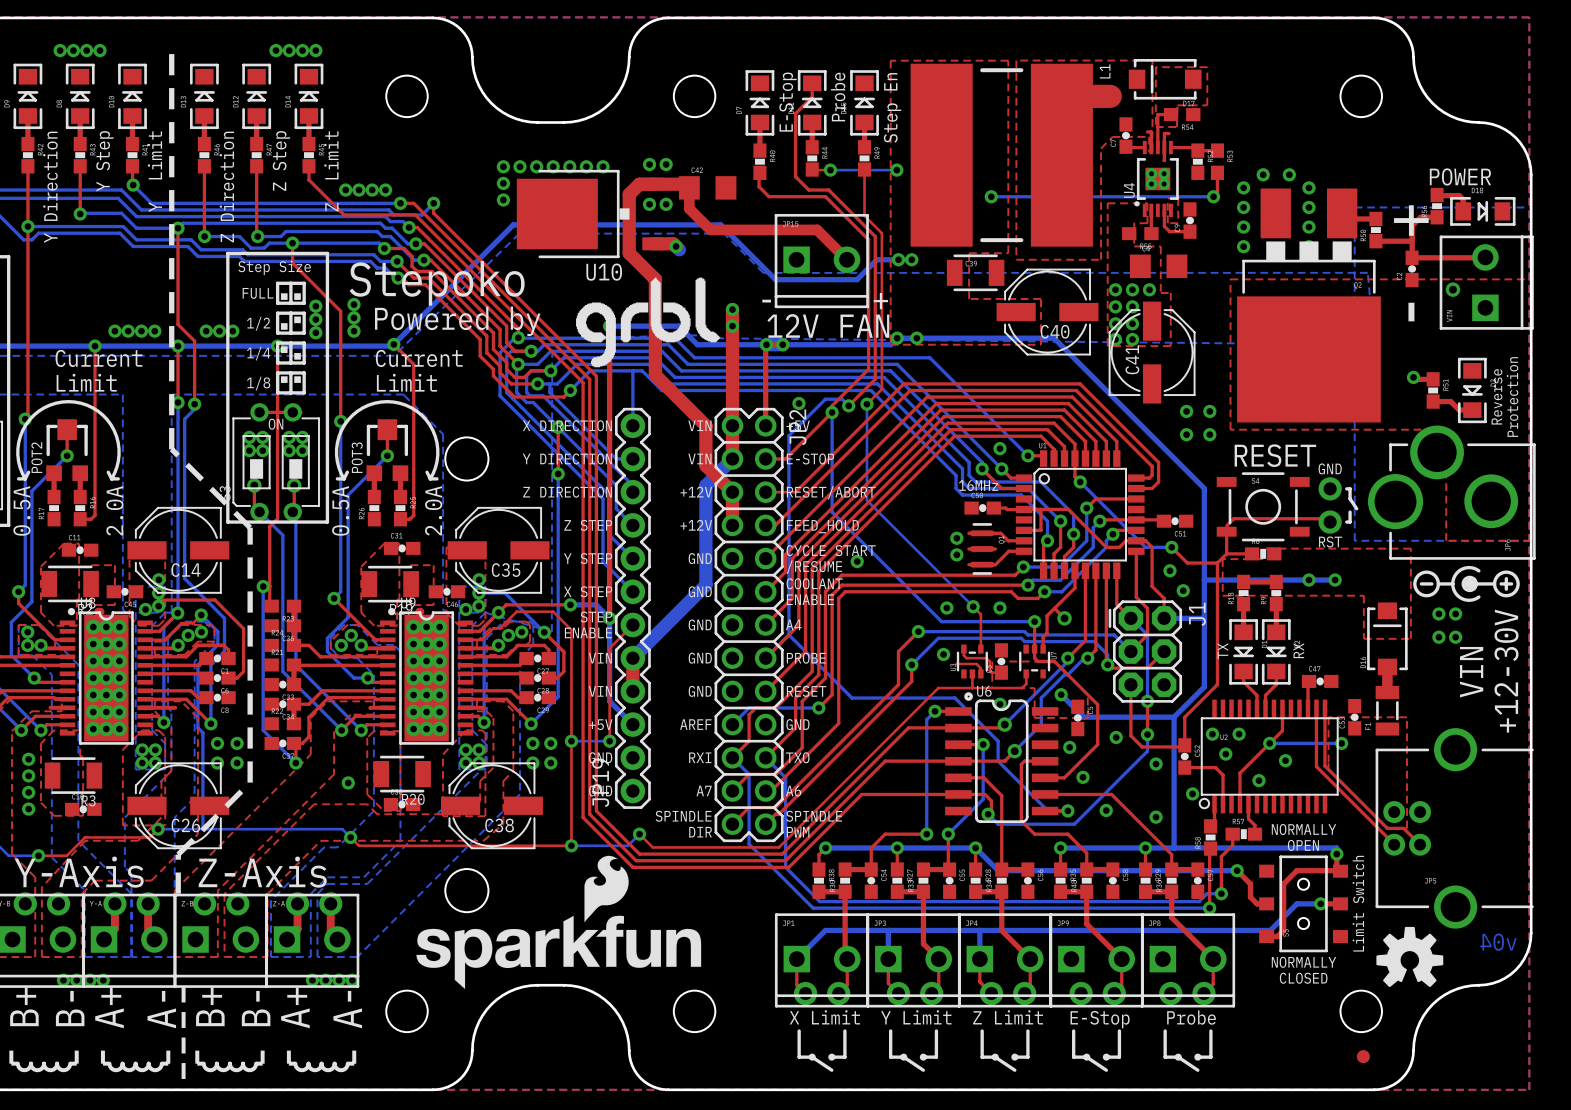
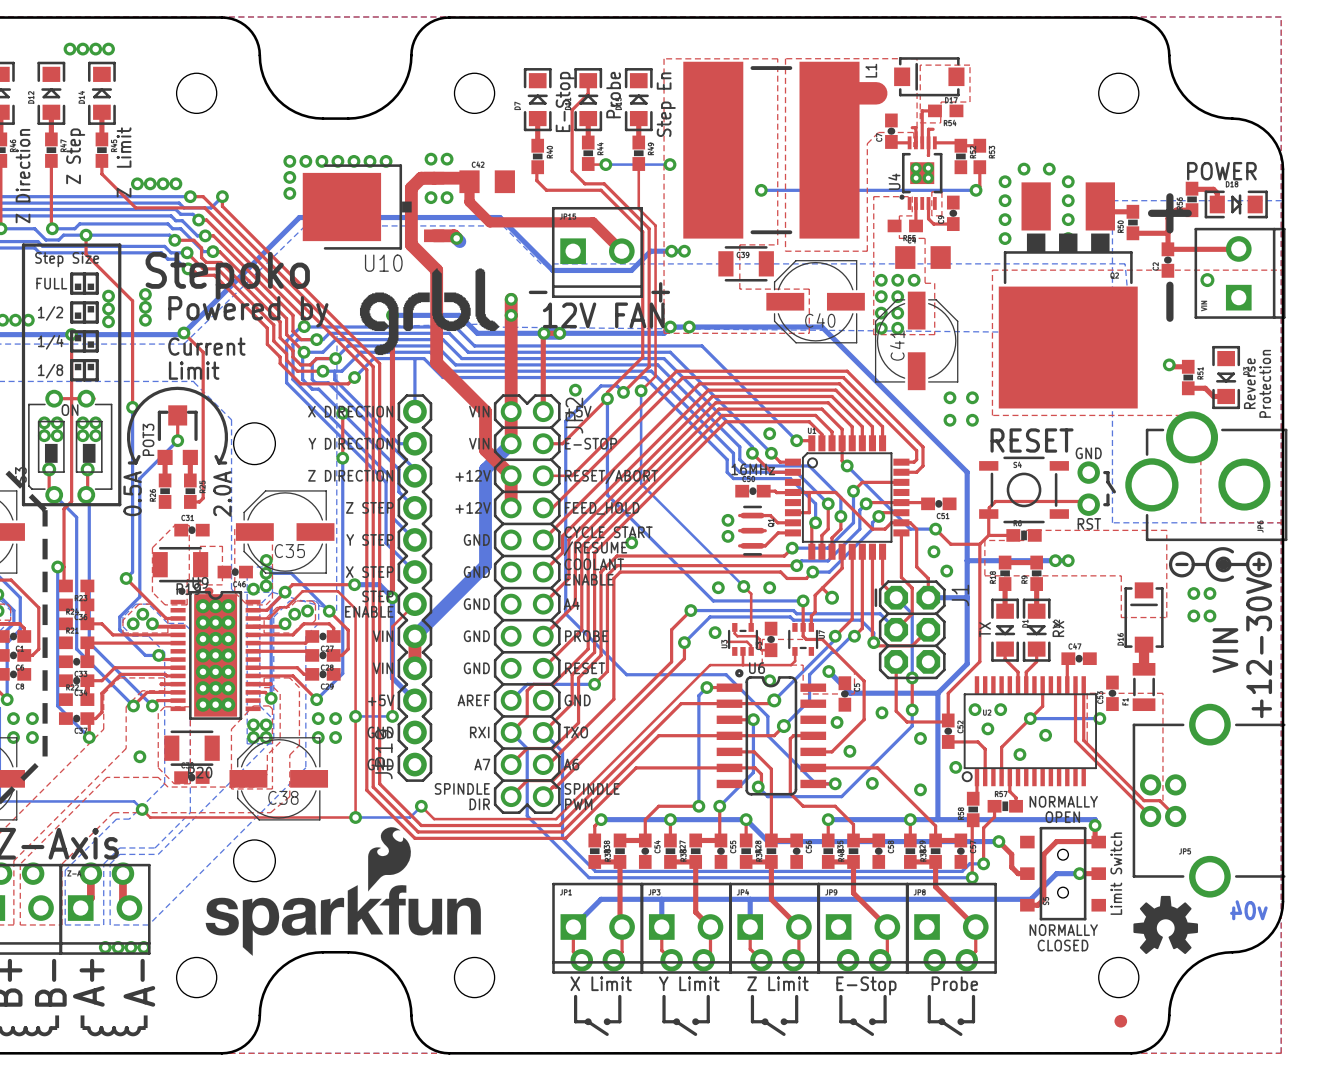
bottom track: (1311, 580) (1335, 580) -> none
via position: (1335, 580) -> (1055, 560)

